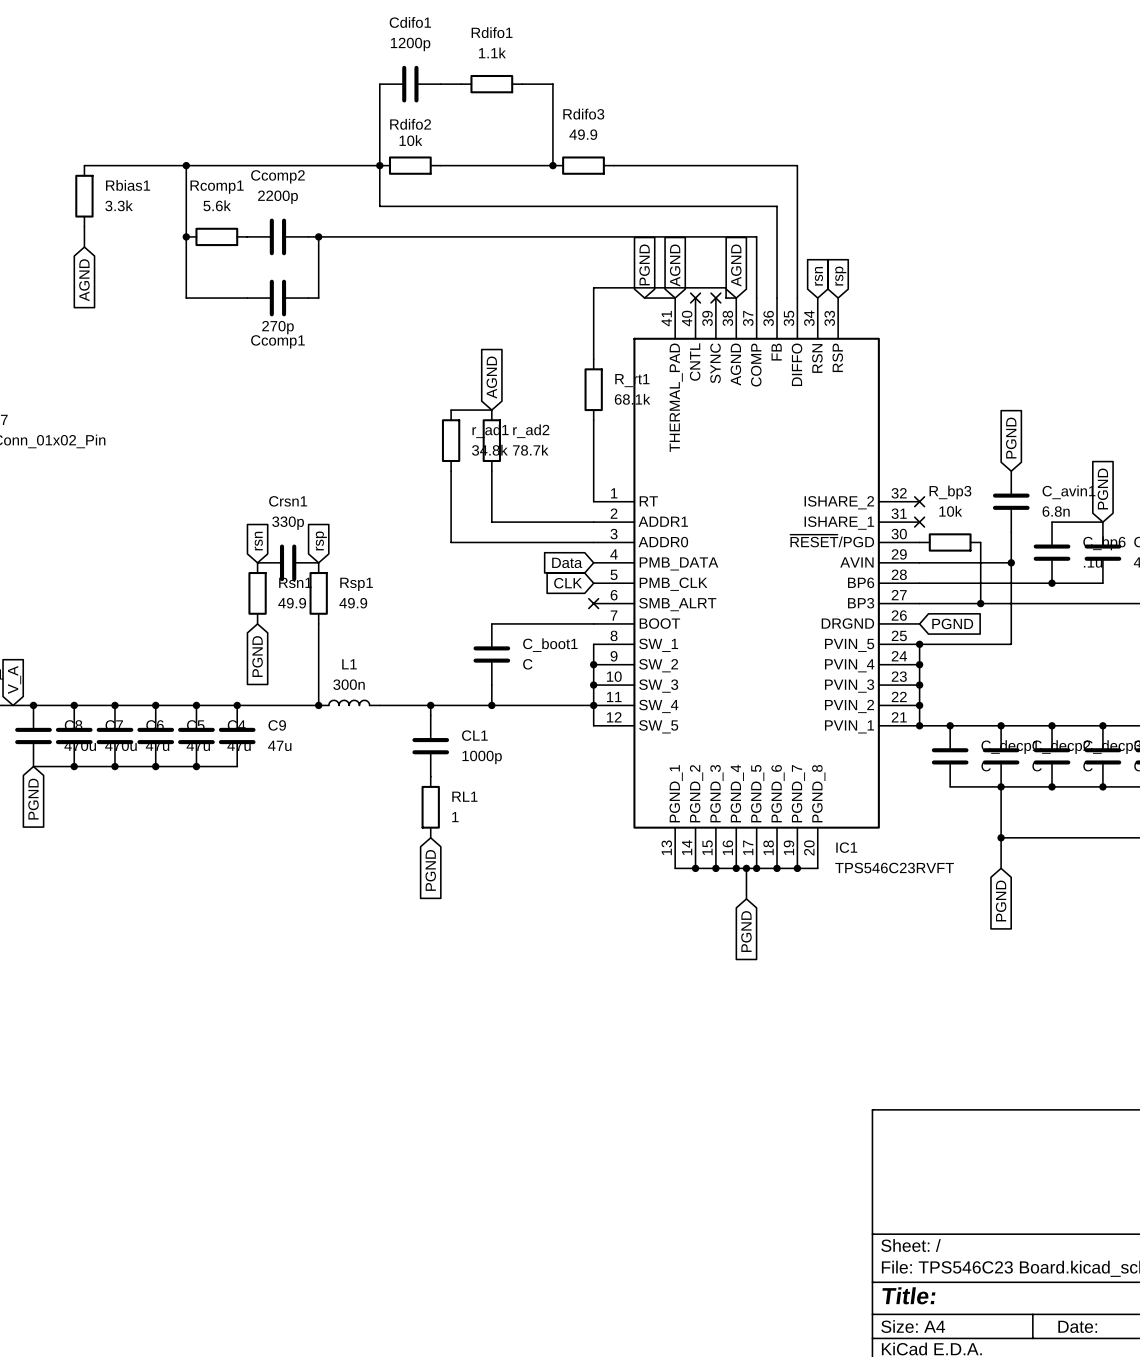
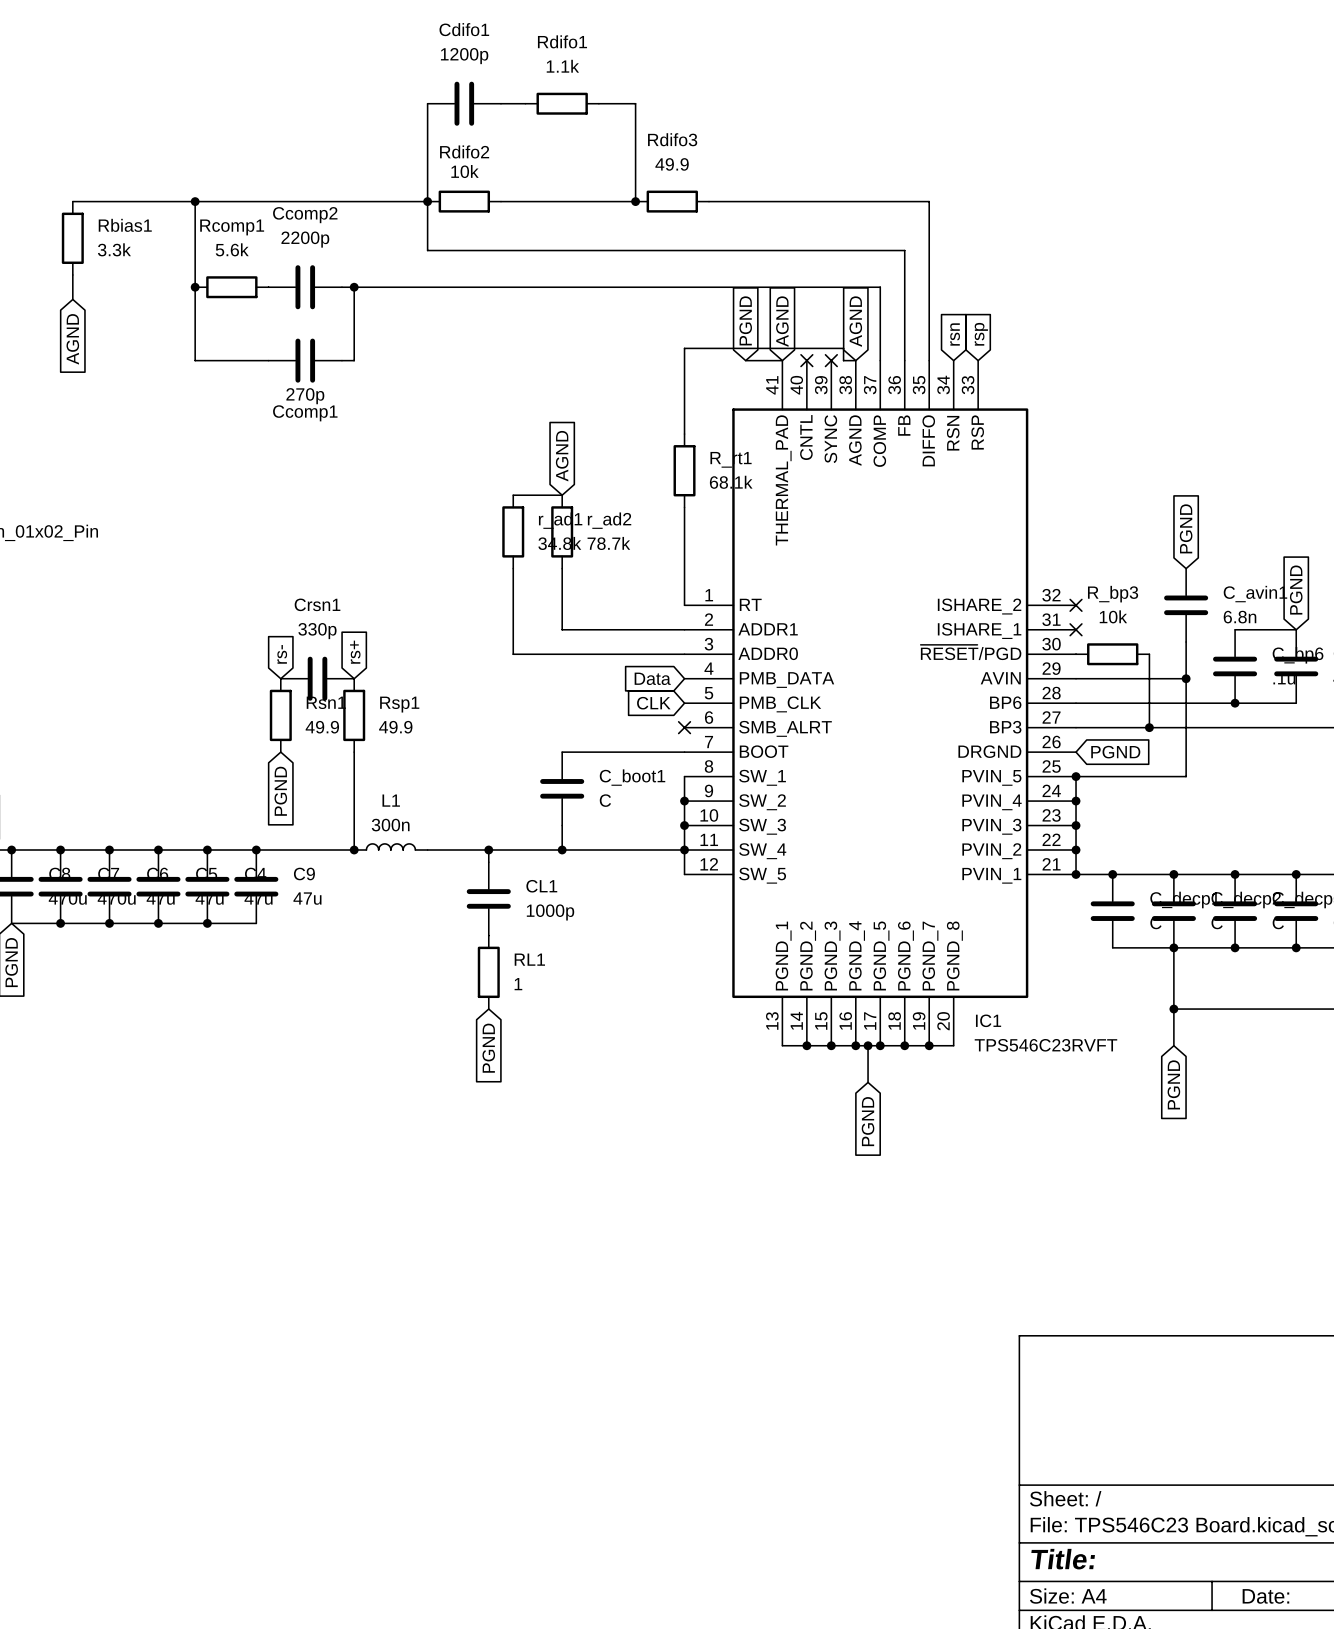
global label: rsp (321, 540) -> rs+ (355, 652)
global label: rsn (258, 541) -> rs- (282, 654)

